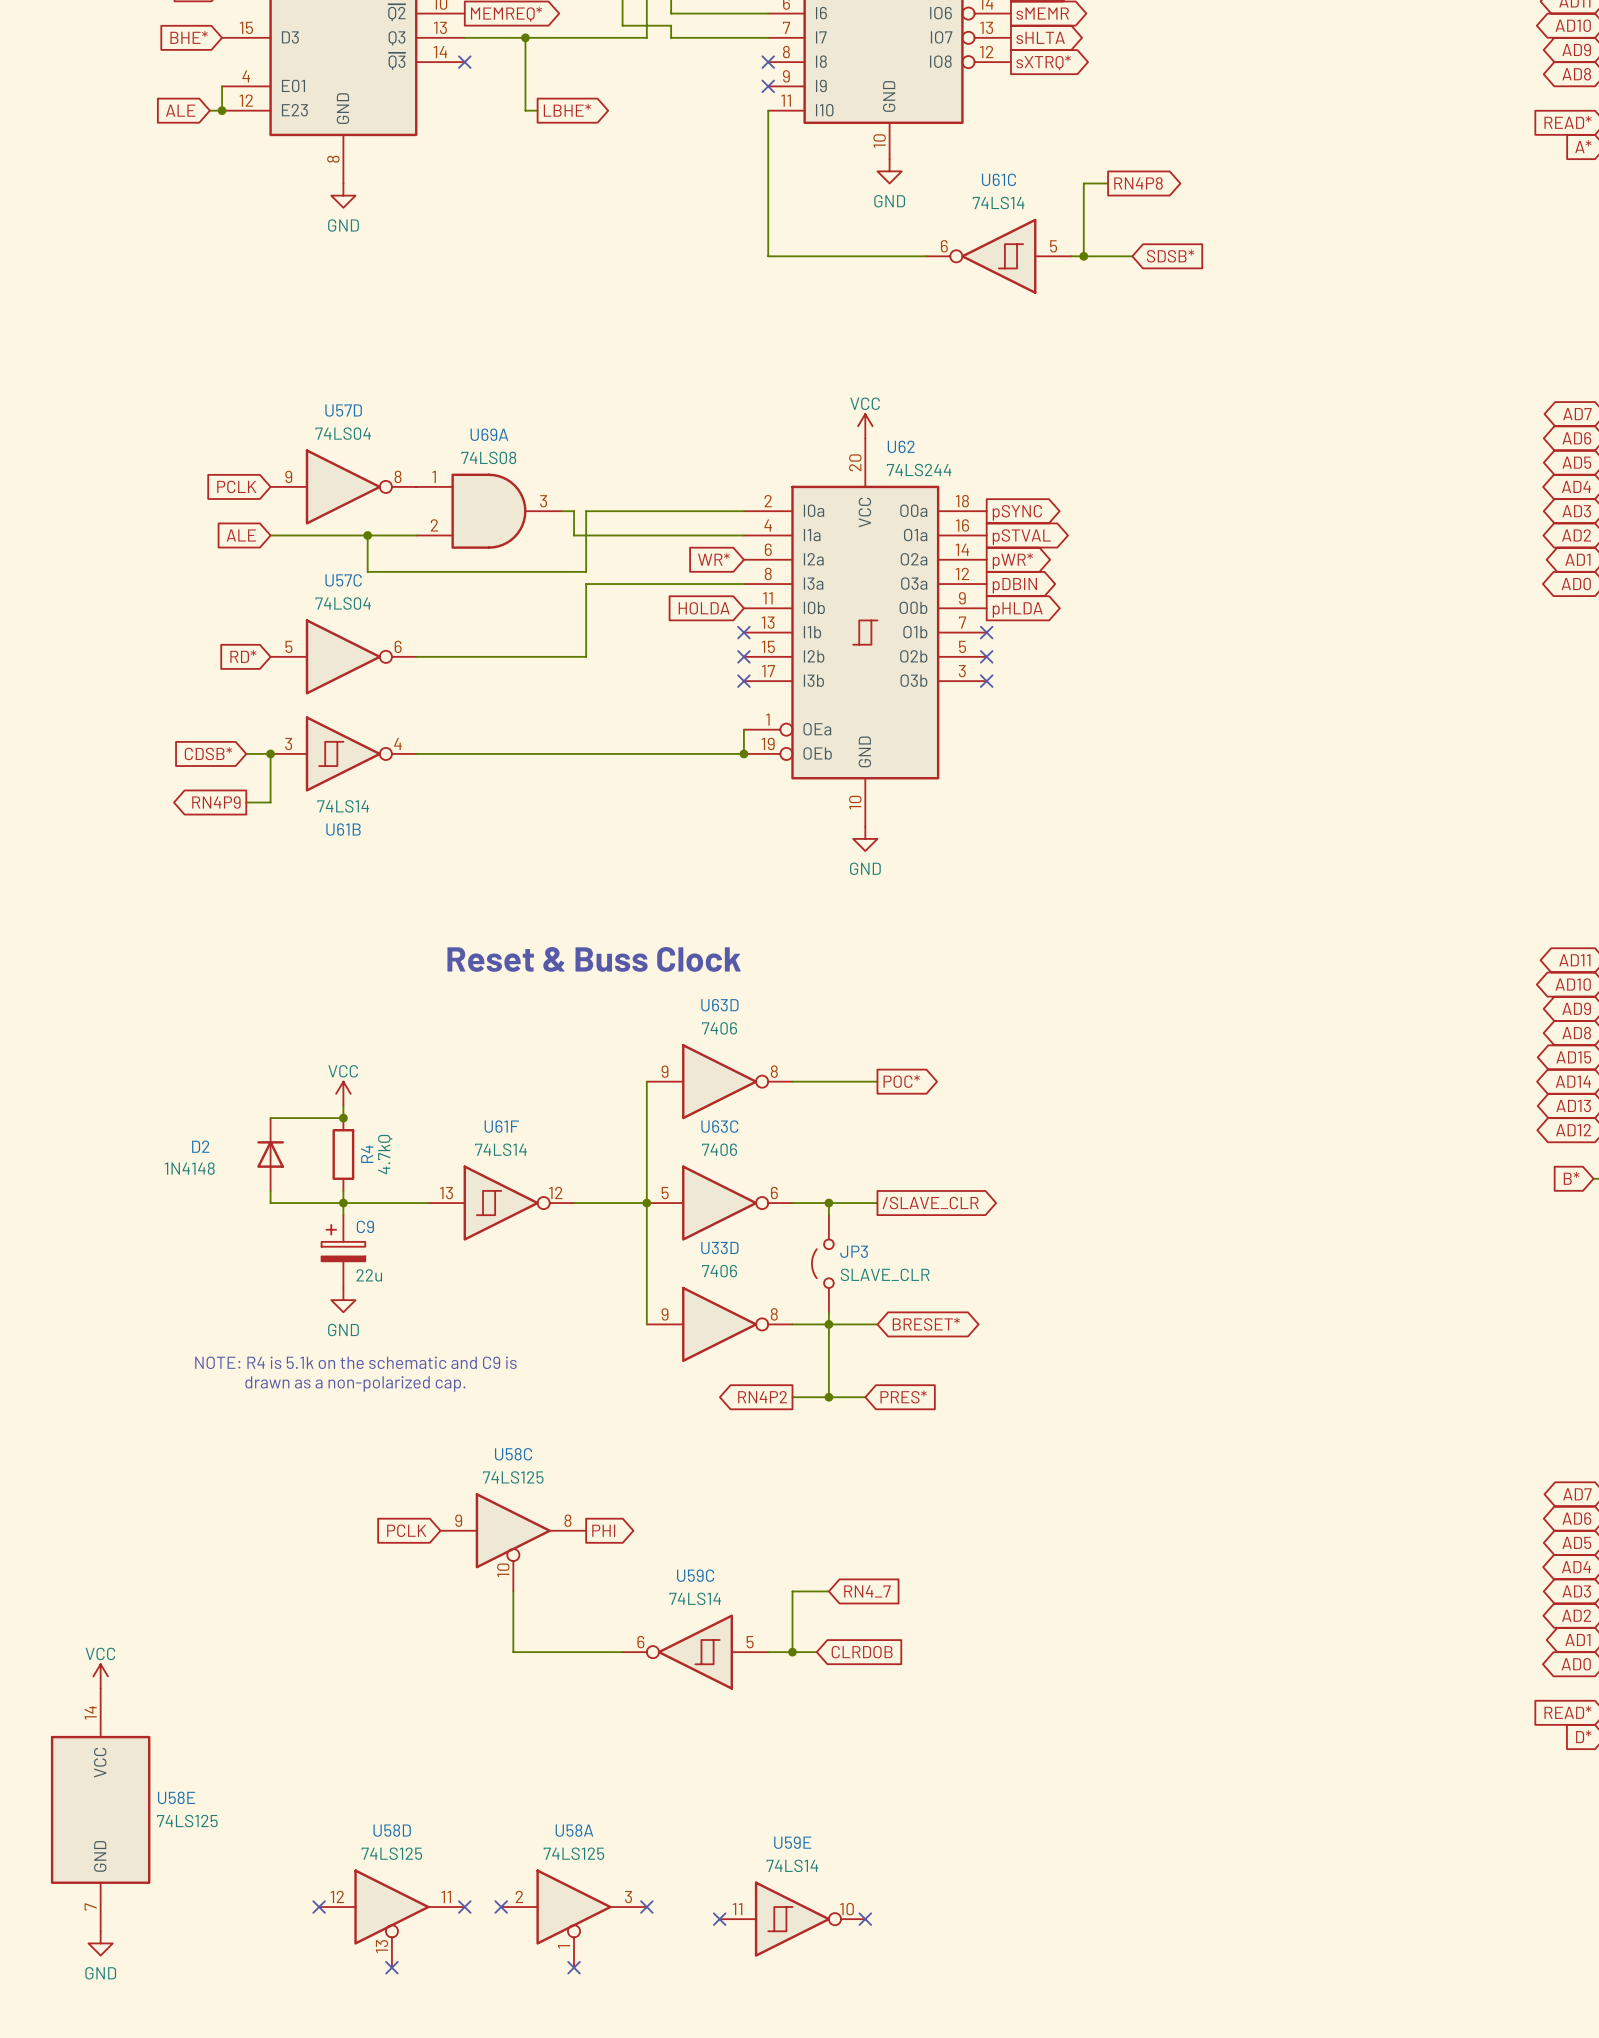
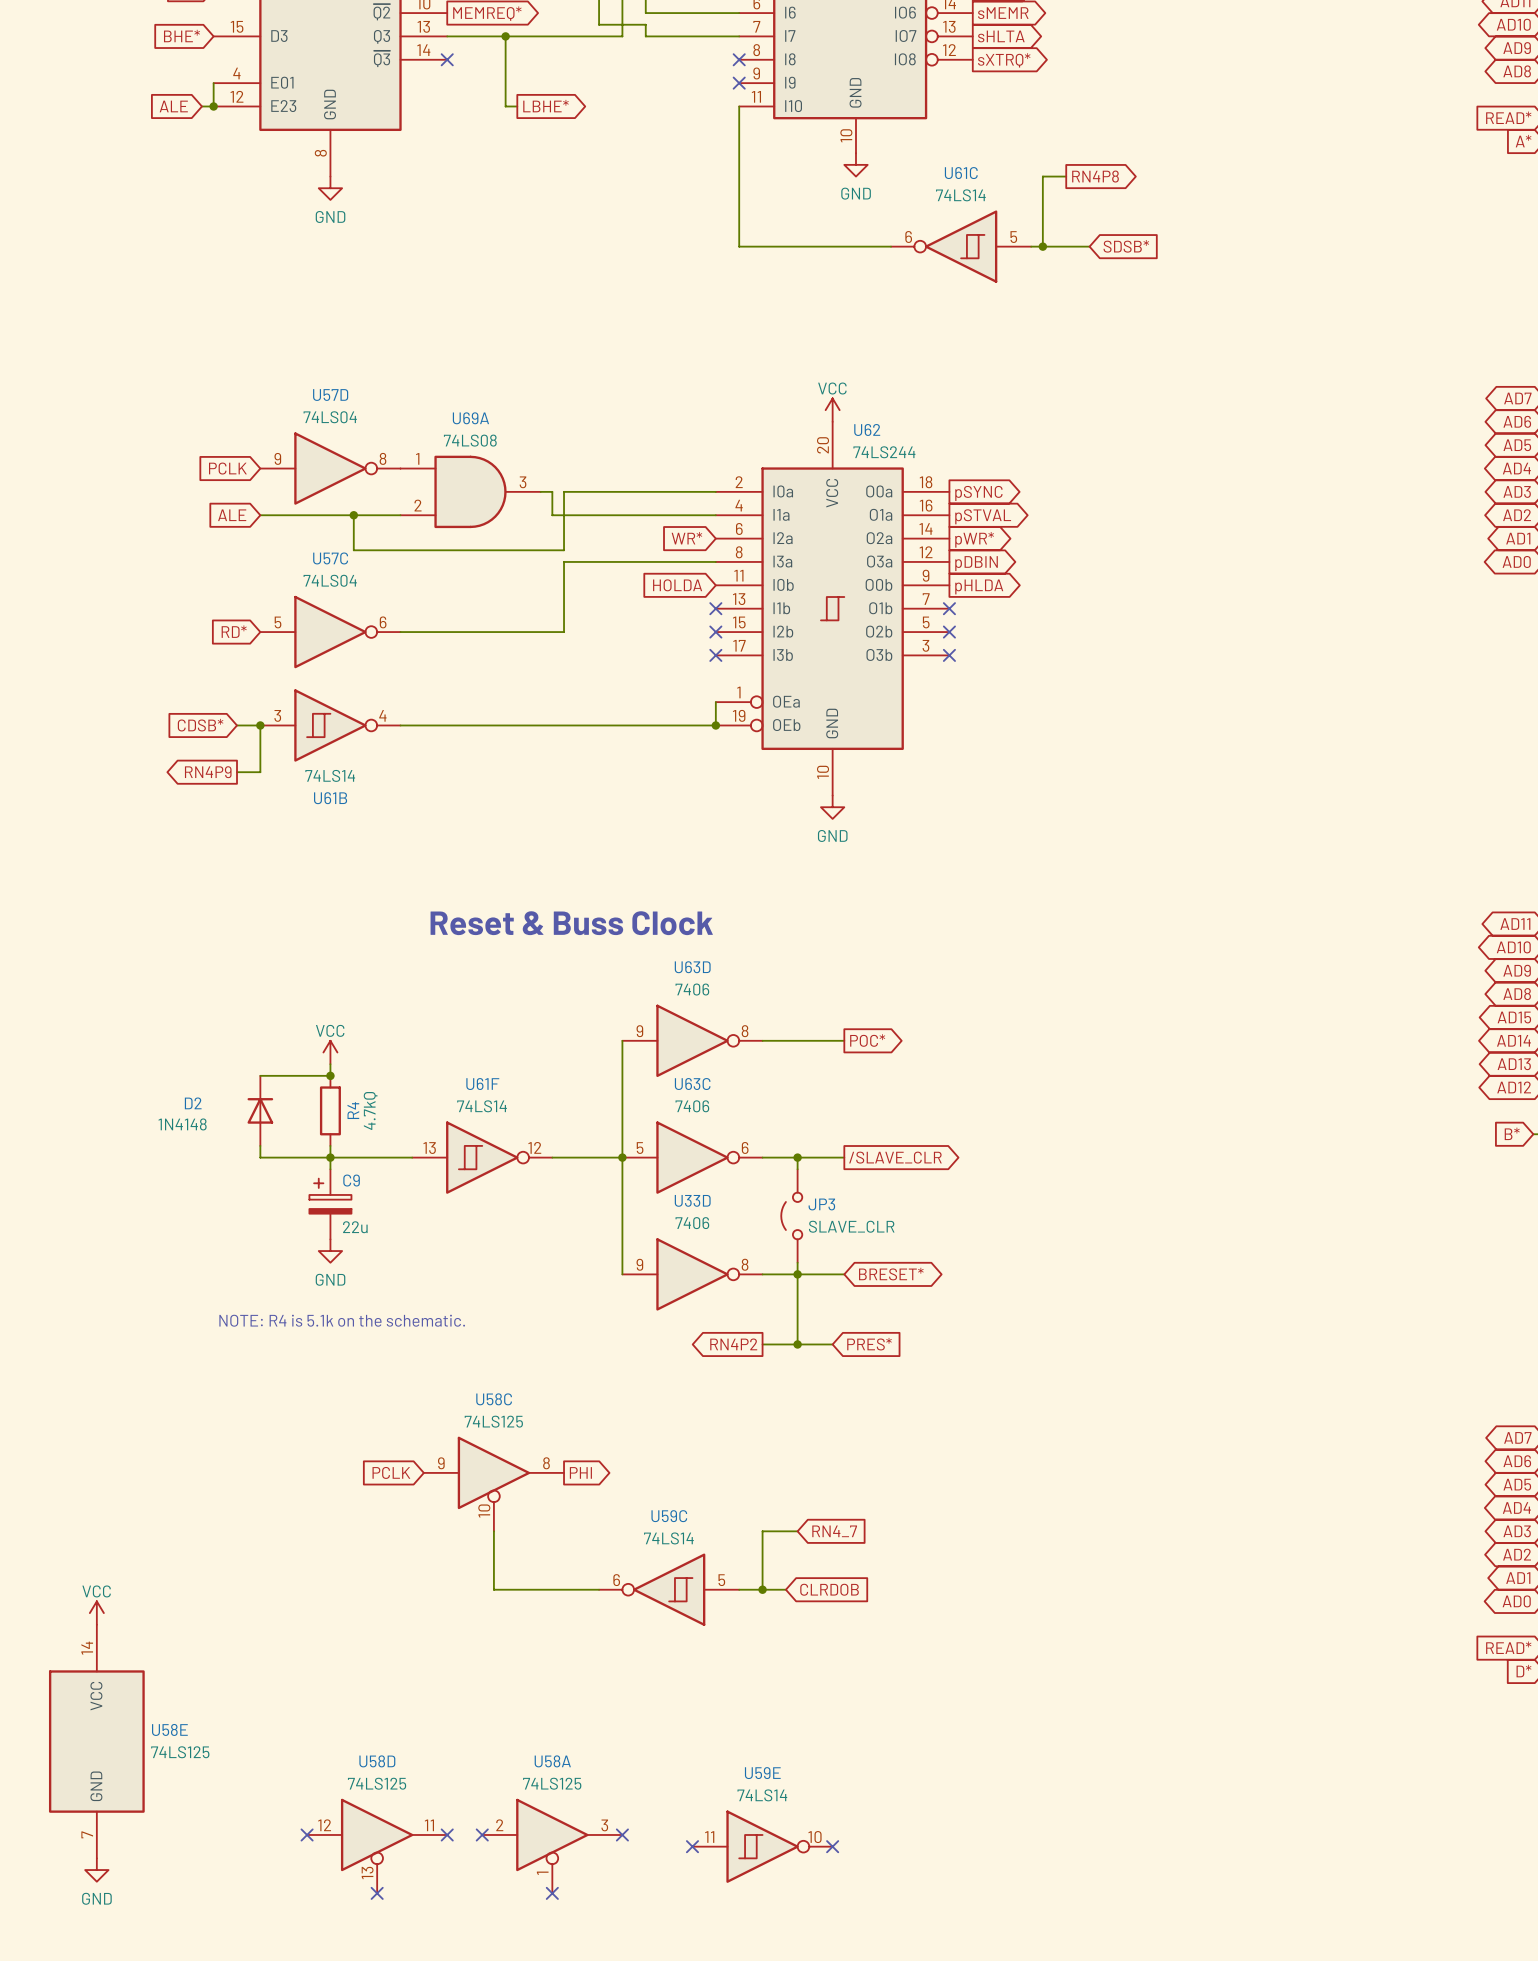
text: NOTE: R4 is 5.1k on the schematic and C9 is (355, 1362) -> NOTE: R4 is 5.1k on the schematic. (342, 1320)
text: drawn as a non-polarized cap. (355, 1383) -> none

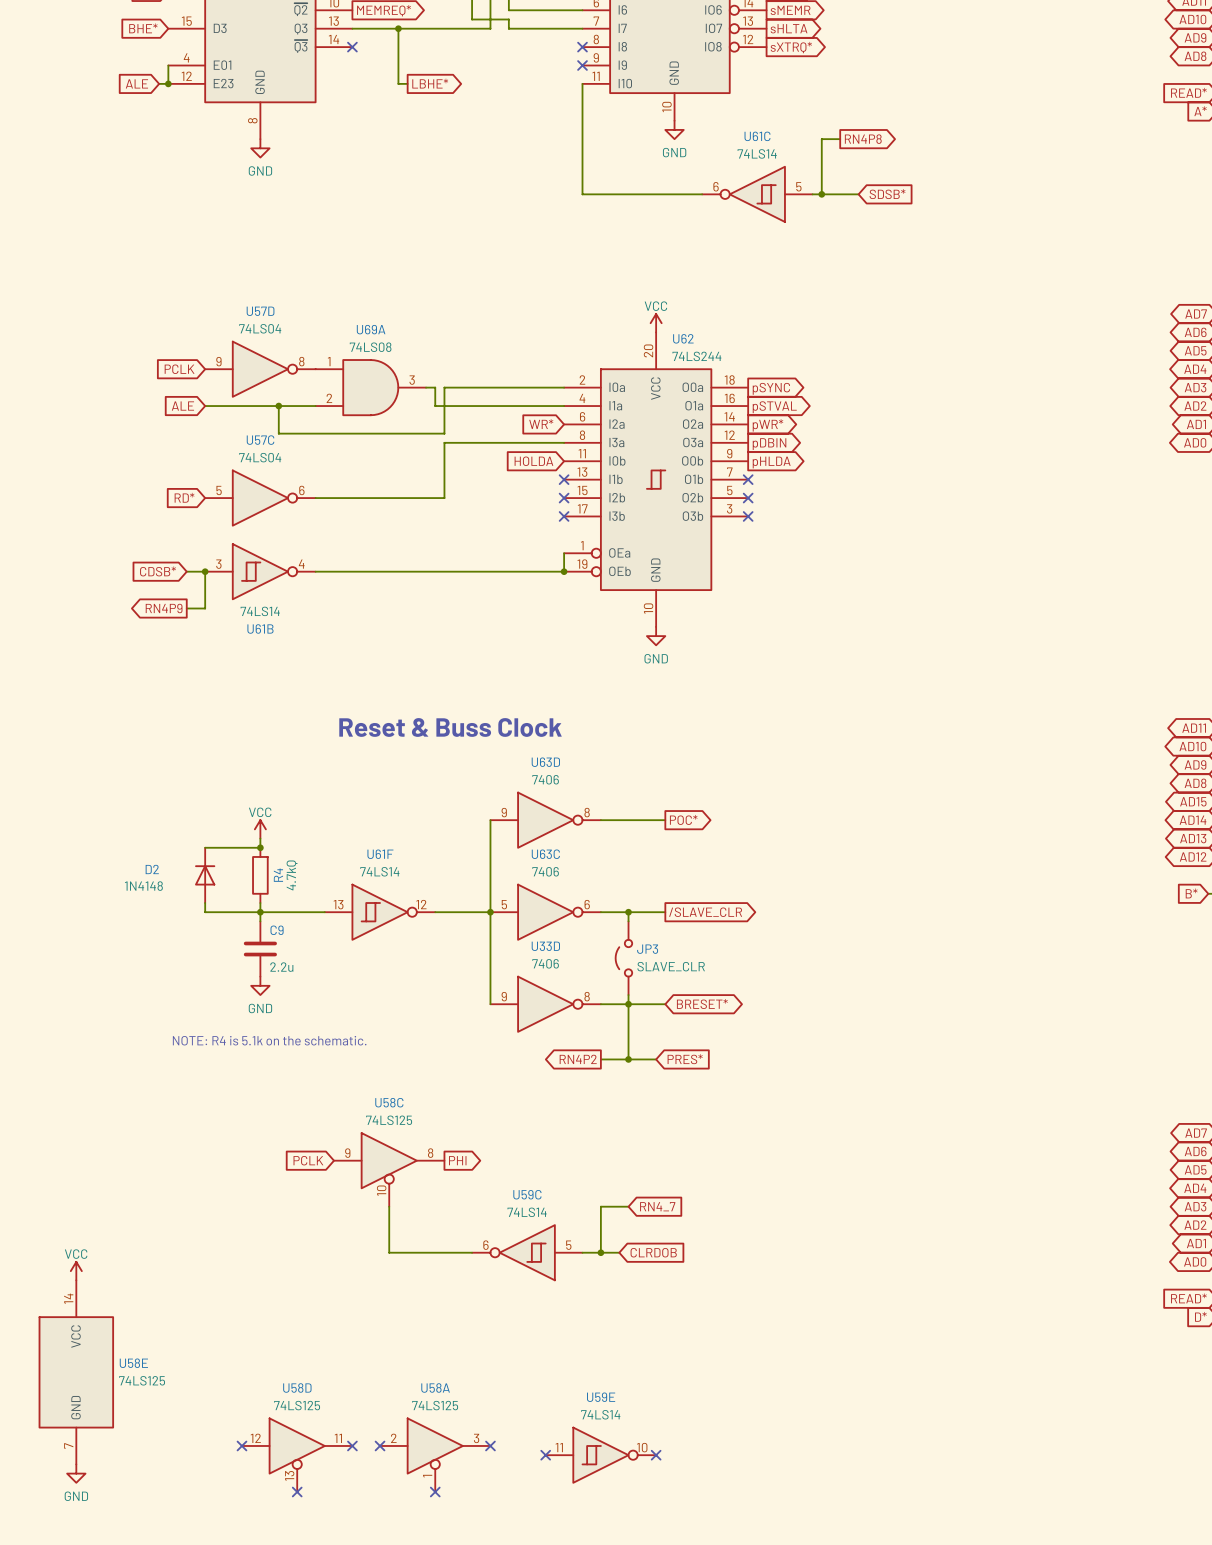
C9 symbol: [309, 1169, 352, 1240] -> [243, 921, 277, 977]
C9 value: 22u (355, 1227) -> 2.2u (281, 967)

